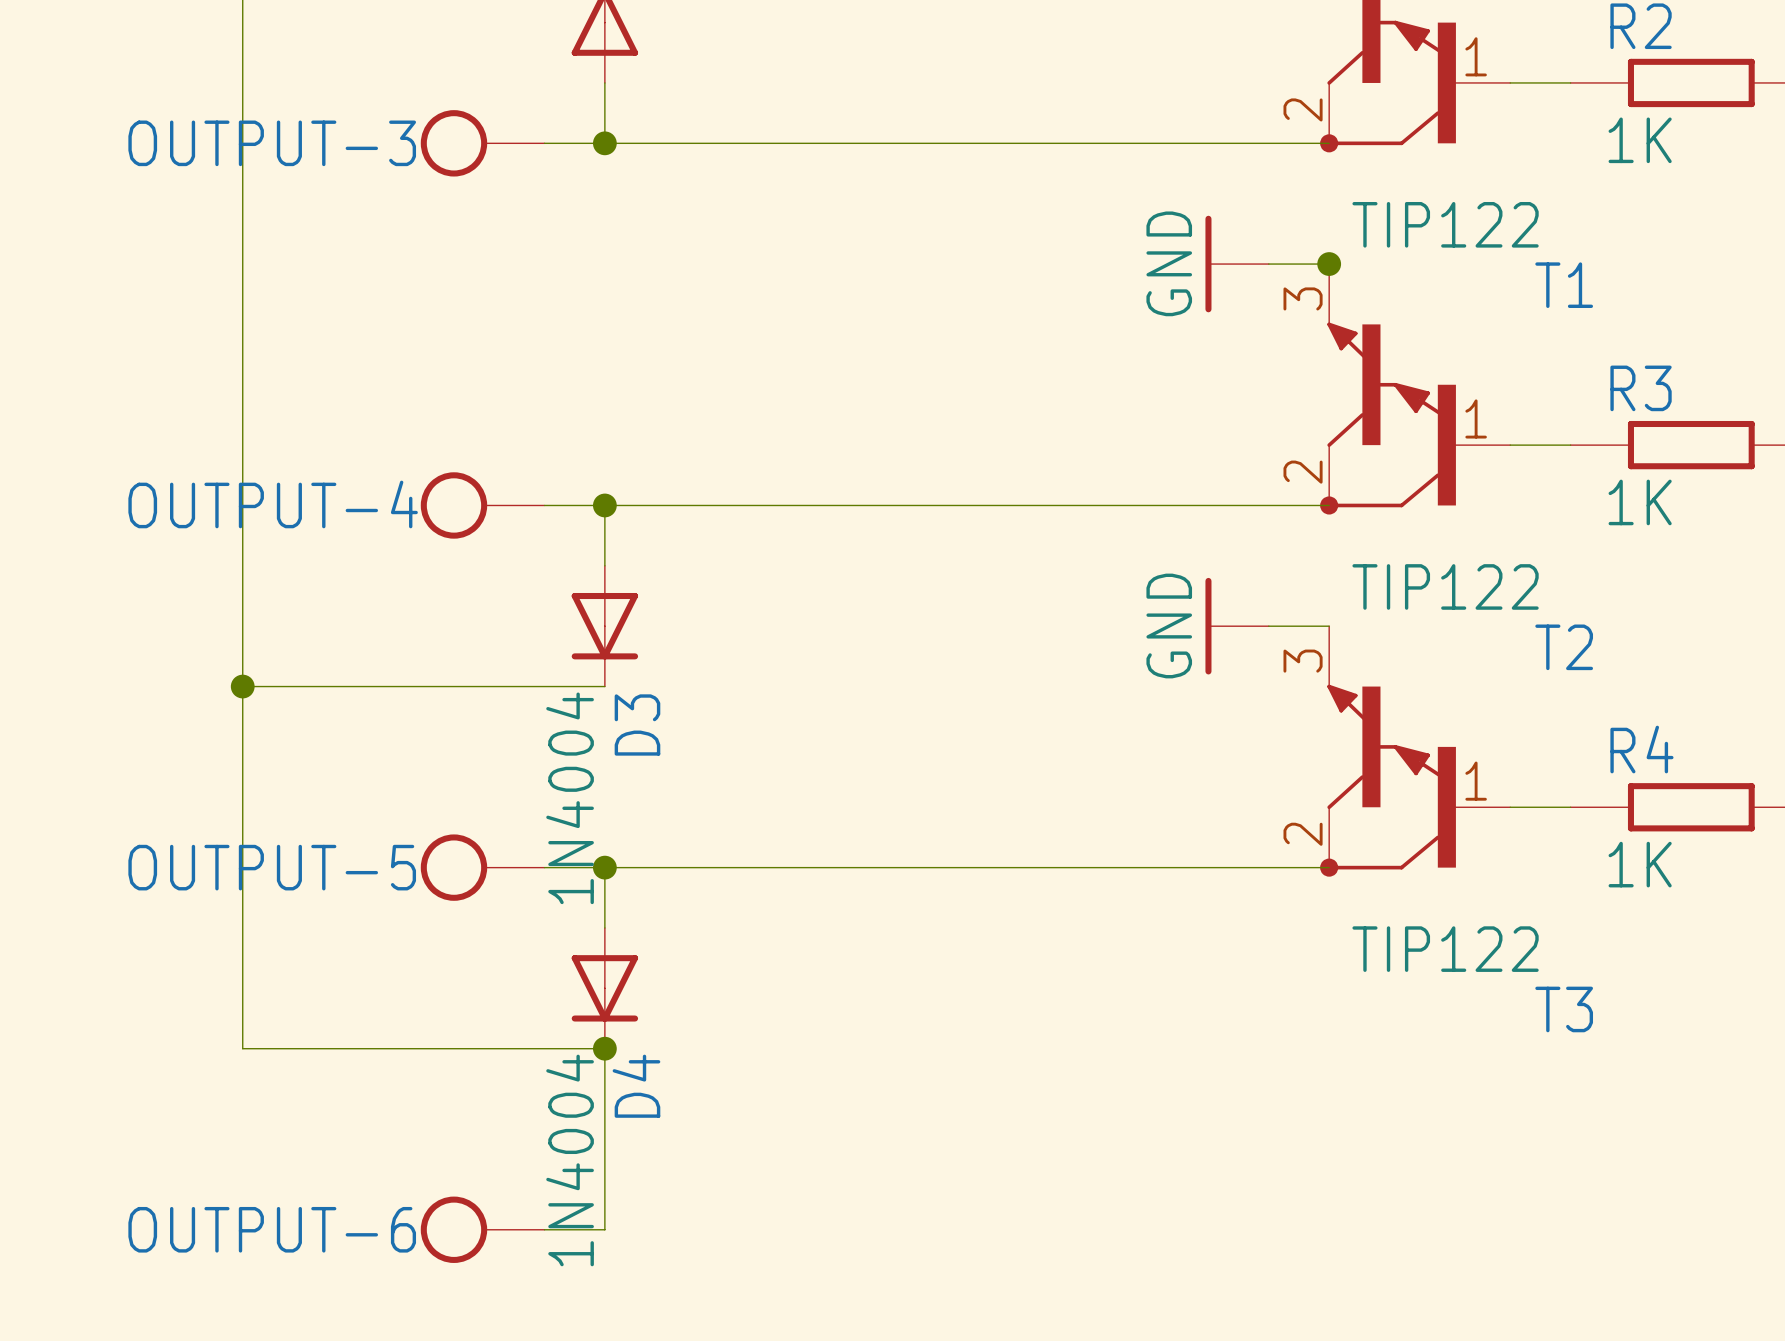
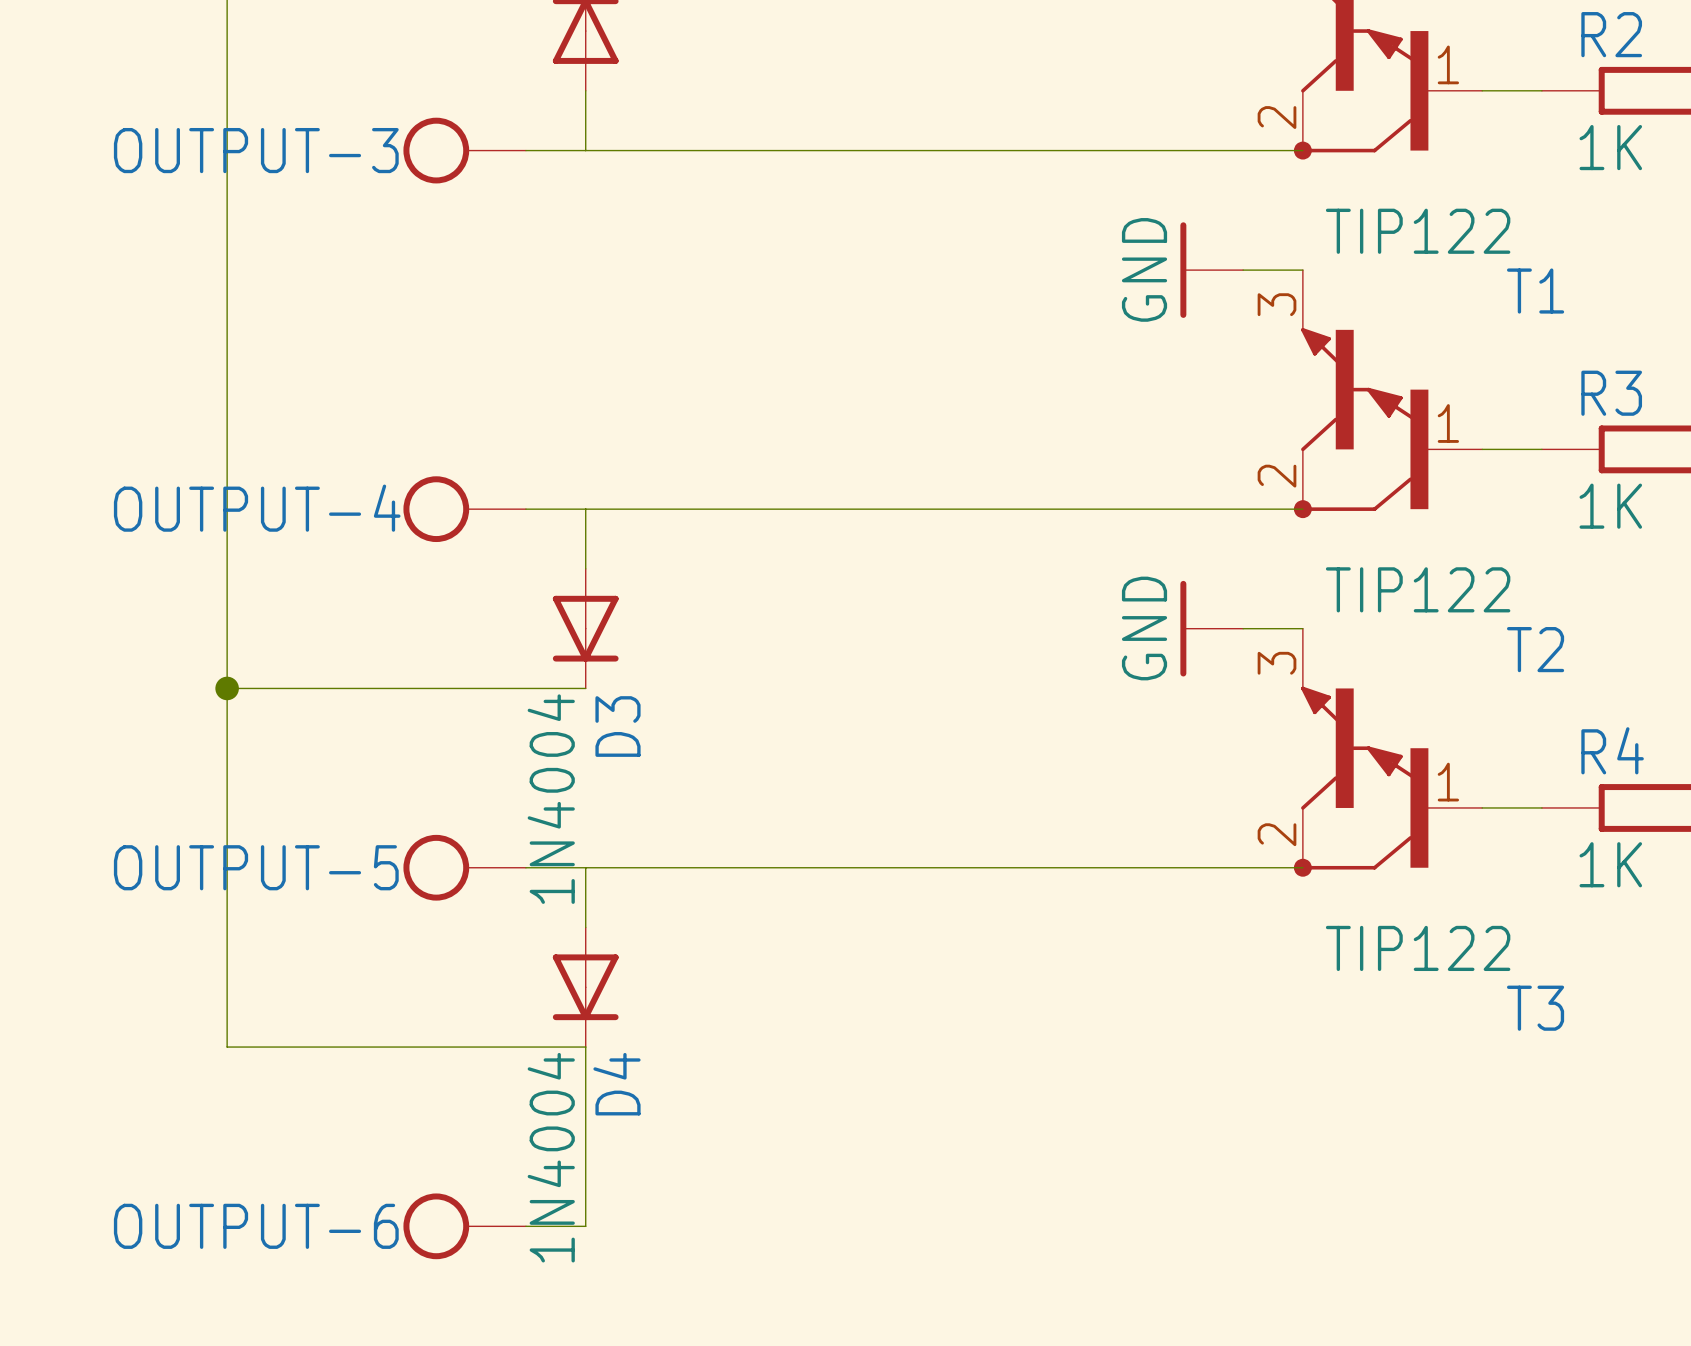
junction: (604, 143) -> none
junction: (1329, 264) -> none
junction: (604, 505) -> none
junction: (604, 867) -> none
junction: (604, 1048) -> none

